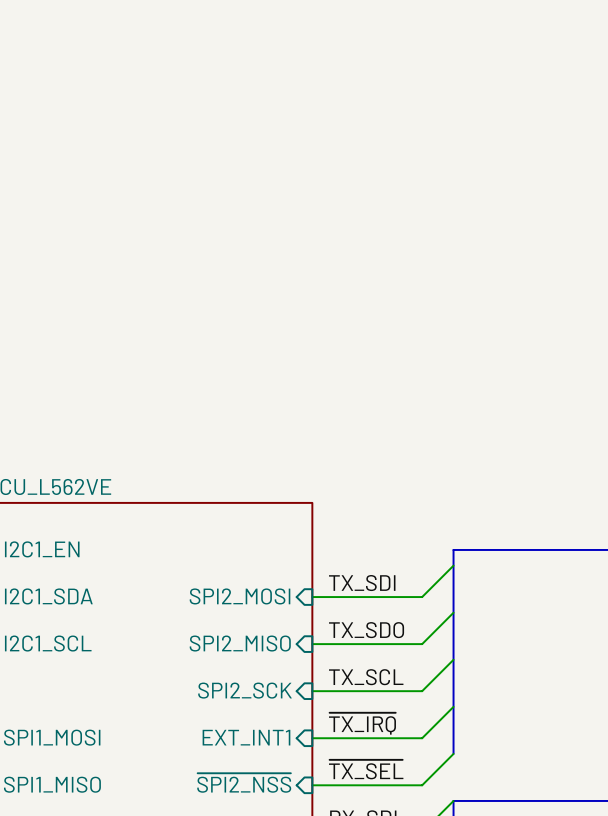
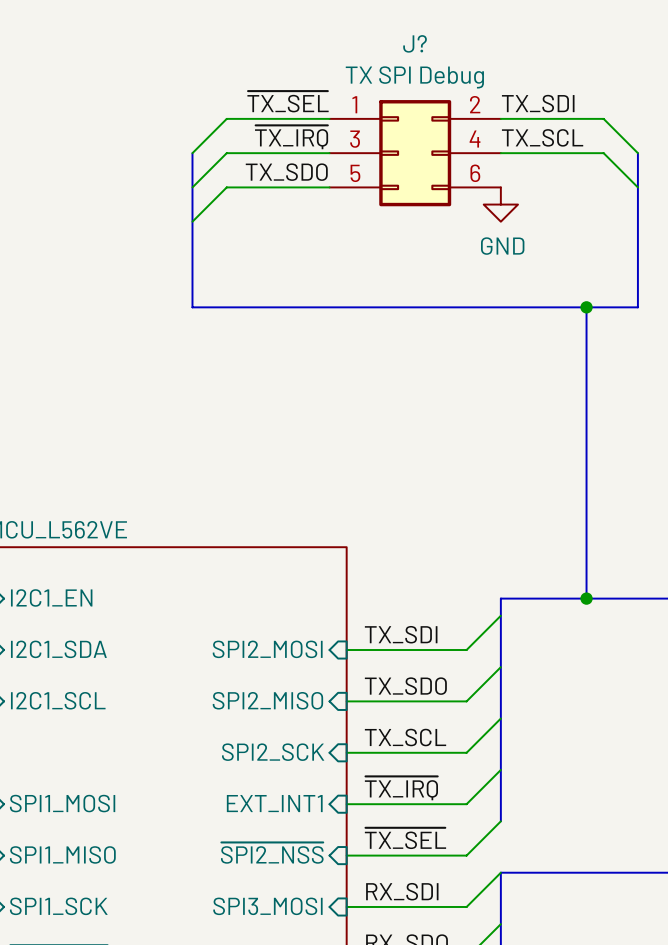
label: none -> ~{TX_SEL} (288, 101)
label: none -> TX_SDI (538, 103)
wire: none -> (329, 118) (226, 118) (192, 153)
wire: none -> (500, 118) (603, 118) (637, 153)
label: none -> ~{TX_IRQ} (291, 137)
label: none -> TX_SCL (542, 137)
bus: none -> (192, 153) (192, 307) (637, 307) (637, 153)
wire: none -> (329, 153) (226, 153) (192, 187)
J?: none -> TX SPI Debug (415, 153)
wire: none -> (500, 153) (603, 153) (637, 187)
label: none -> TX_SDO (286, 172)
wire: none -> (329, 187) (226, 187) (192, 221)
power symbol: none -> GND (500, 204)
bus: none -> (586, 307) (586, 598)
junction: none -> (586, 307)
junction: none -> (586, 598)

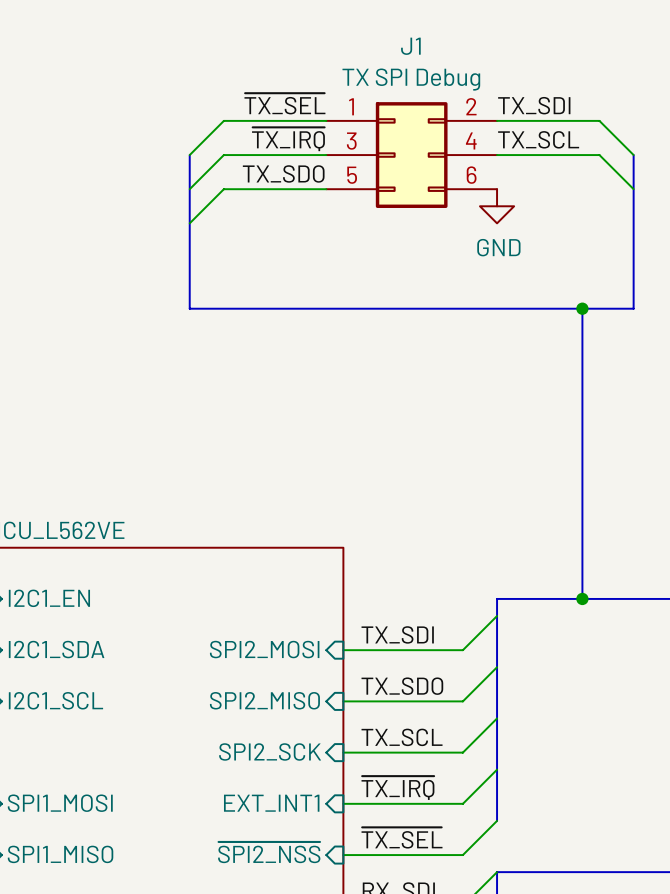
J? name: J? (415, 43) -> J1 (410, 46)

